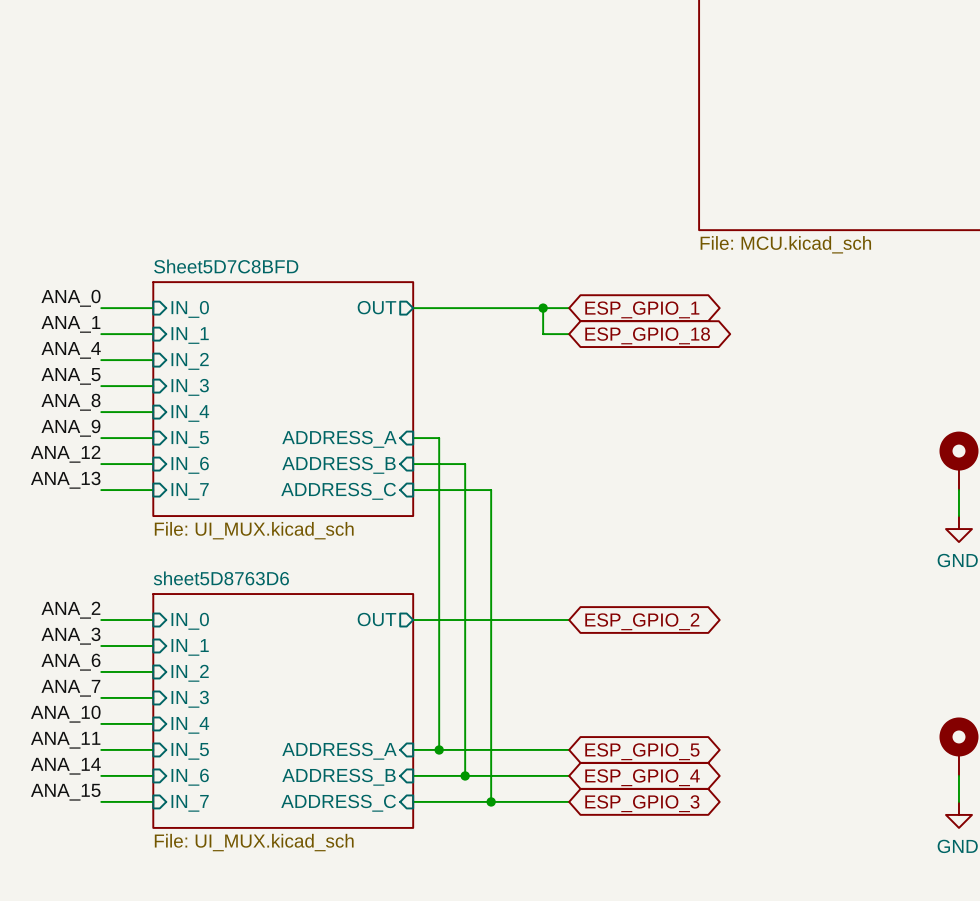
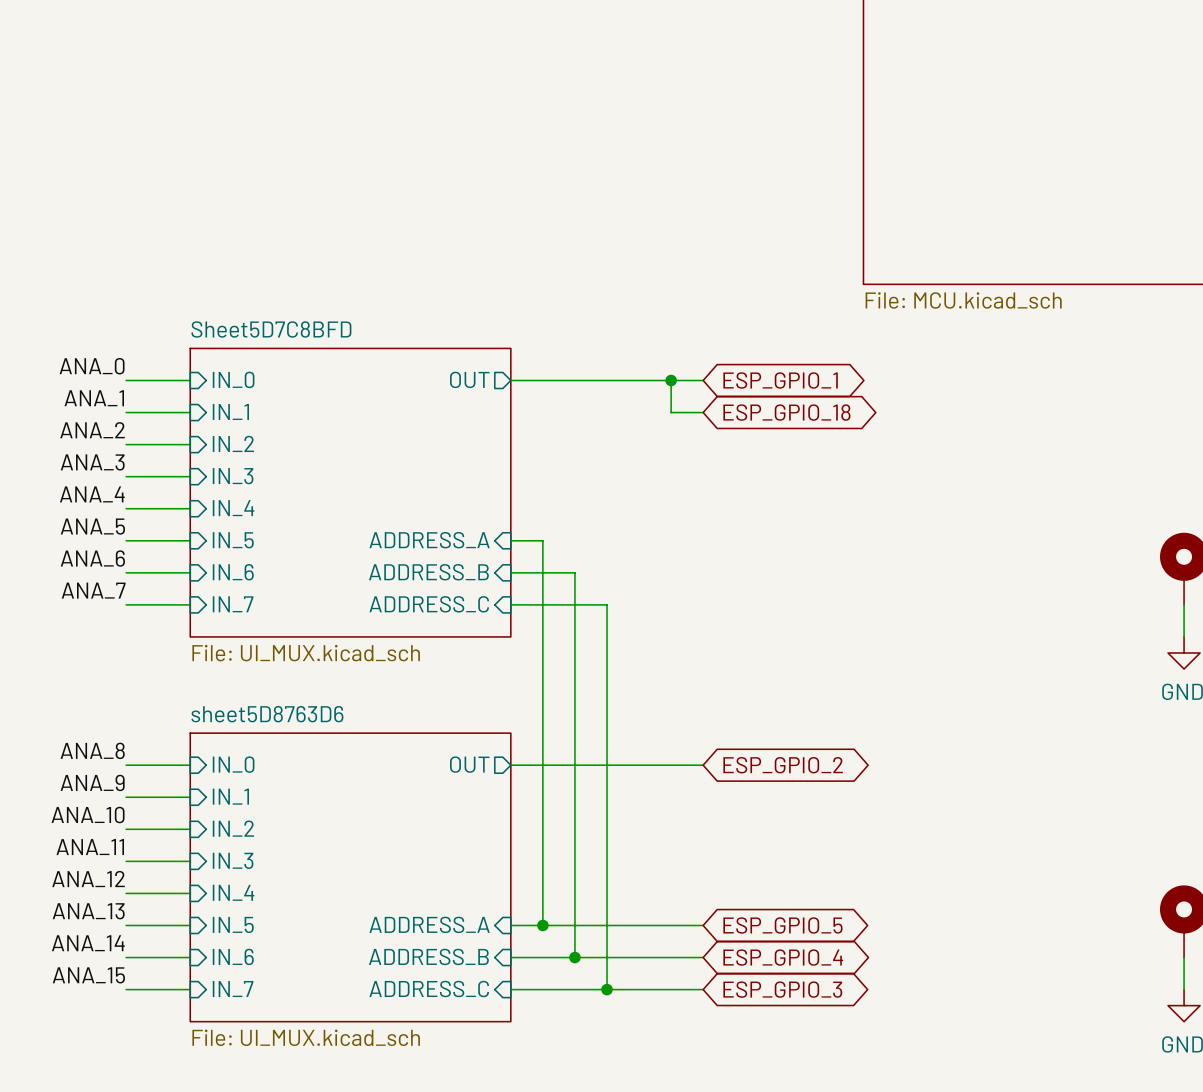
label: ANA_4 (71, 350) -> ANA_2 (92, 430)
label: ANA_5 (70, 376) -> ANA_3 (92, 462)
label: ANA_8 (70, 402) -> ANA_4 (92, 494)
label: ANA_9 (70, 428) -> ANA_5 (92, 526)
label: ANA_12 (65, 454) -> ANA_6 (92, 558)
label: ANA_13 (65, 480) -> ANA_7 (93, 590)
label: ANA_2 (70, 610) -> ANA_8 (92, 750)
label: ANA_3 (70, 636) -> ANA_9 (92, 782)
label: ANA_6 (70, 662) -> ANA_10 (88, 815)
label: ANA_7 (70, 688) -> ANA_11 (90, 847)
label: ANA_10 (65, 714) -> ANA_12 (88, 879)
label: ANA_11 (65, 740) -> ANA_13 (88, 911)

